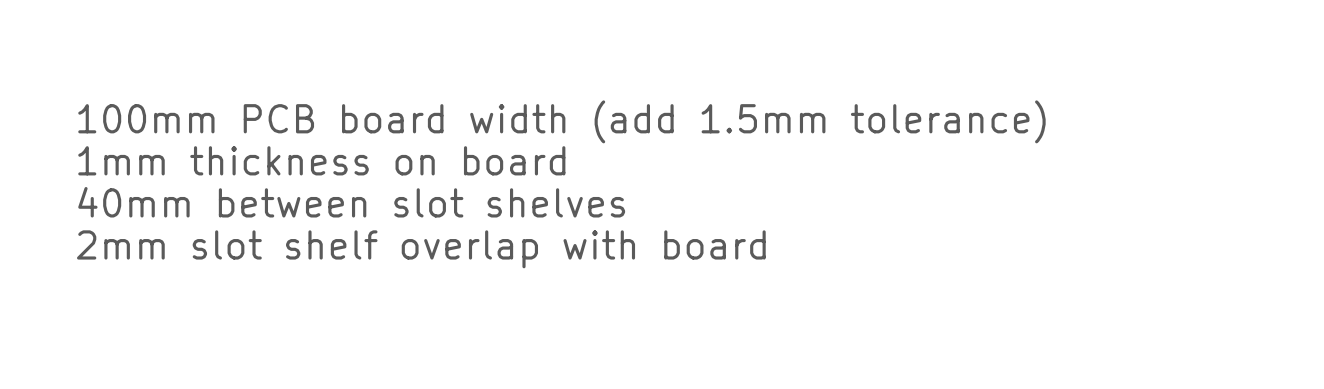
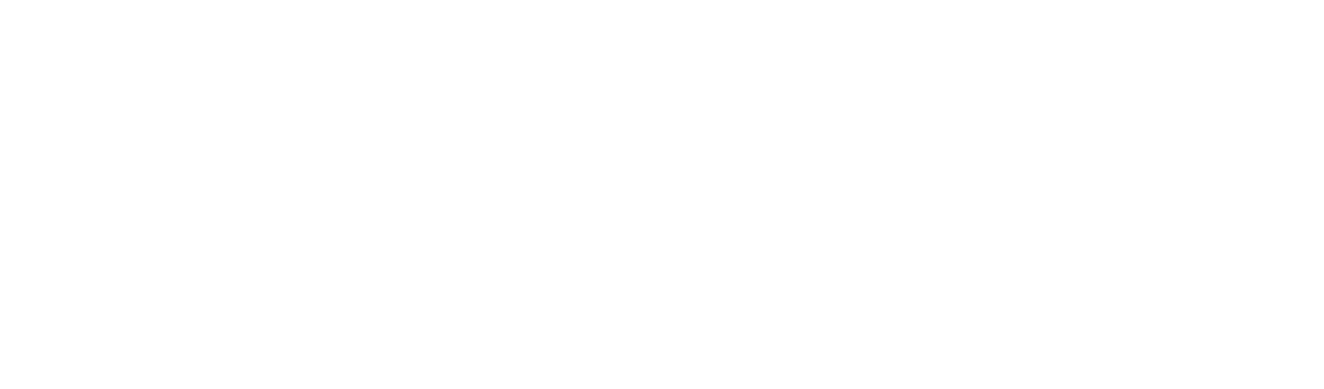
text: 100mm PCB board width (add 1.5mm tolerance) (561, 121) -> none
text: 1mm thickness on board (321, 160) -> none
text: 40mm between slot shelves (351, 202) -> none
text: 2mm slot shelf overlap with board (421, 249) -> none

